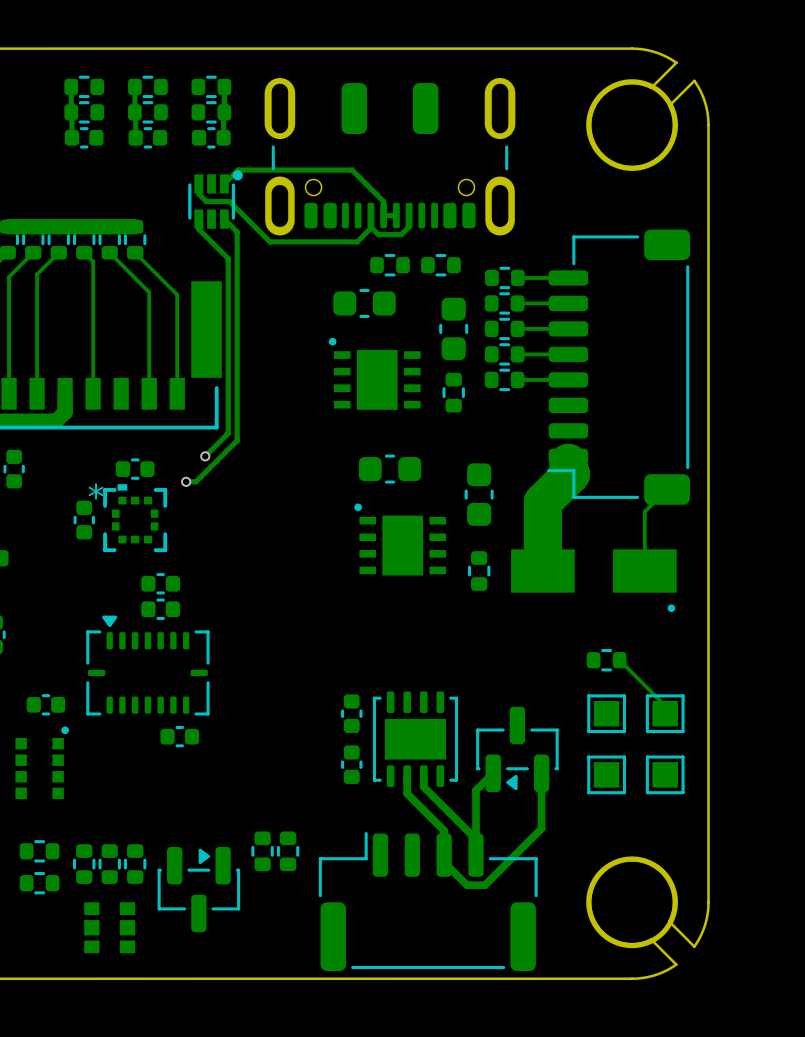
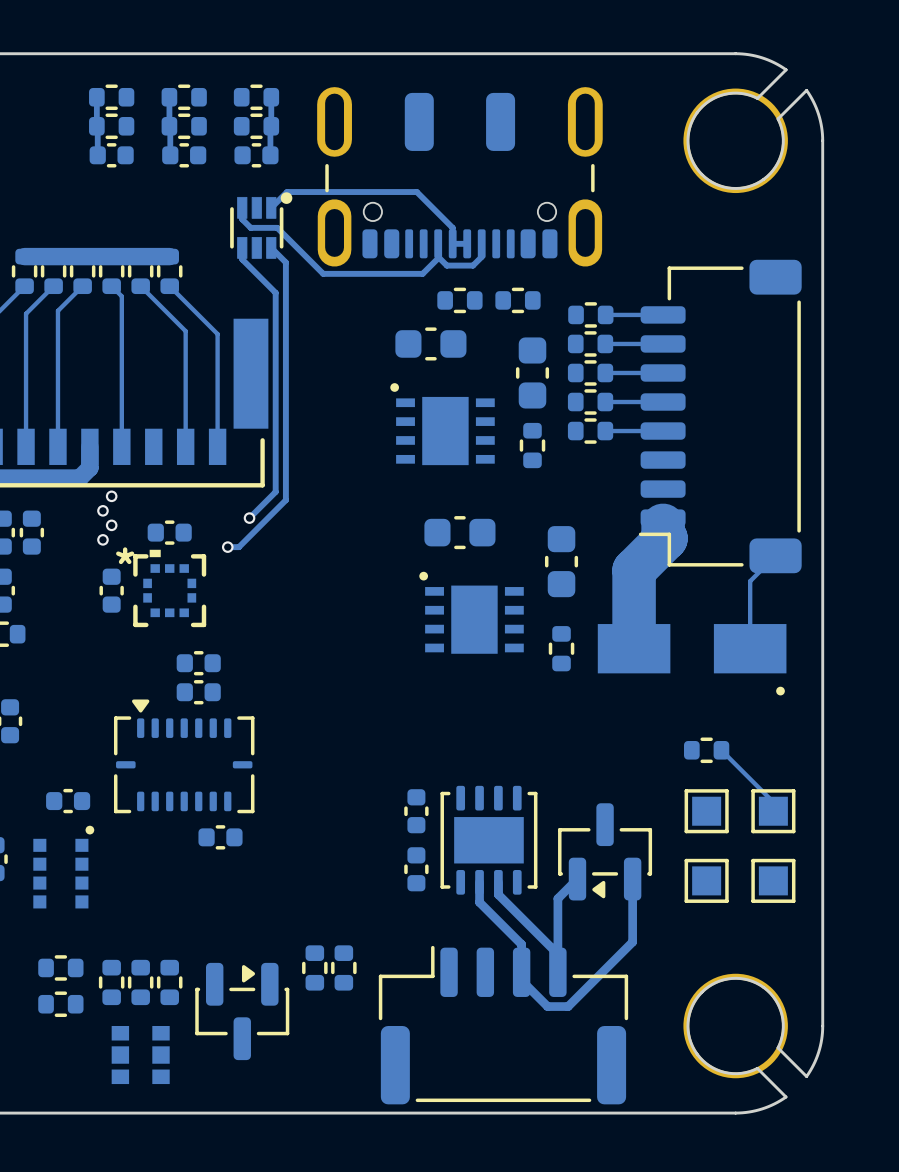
via: none -> (111, 496)
via: none -> (102, 510)
via: none -> (111, 525)
via: none -> (102, 539)

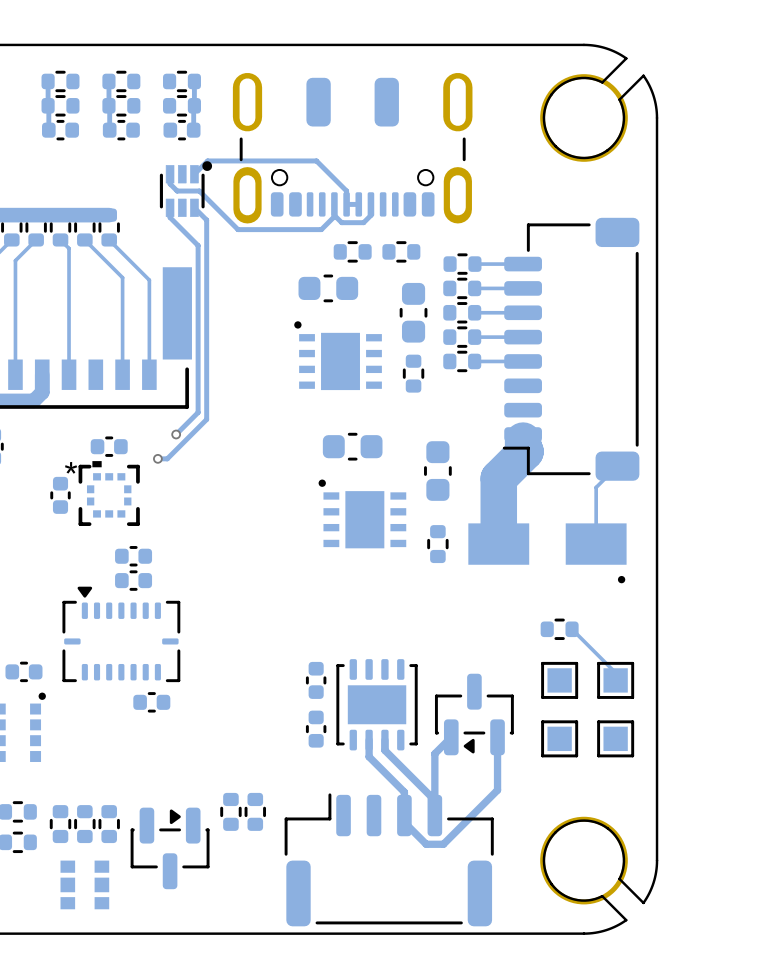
via: (111, 496) -> none
via: (102, 510) -> none
via: (111, 525) -> none
via: (102, 539) -> none

